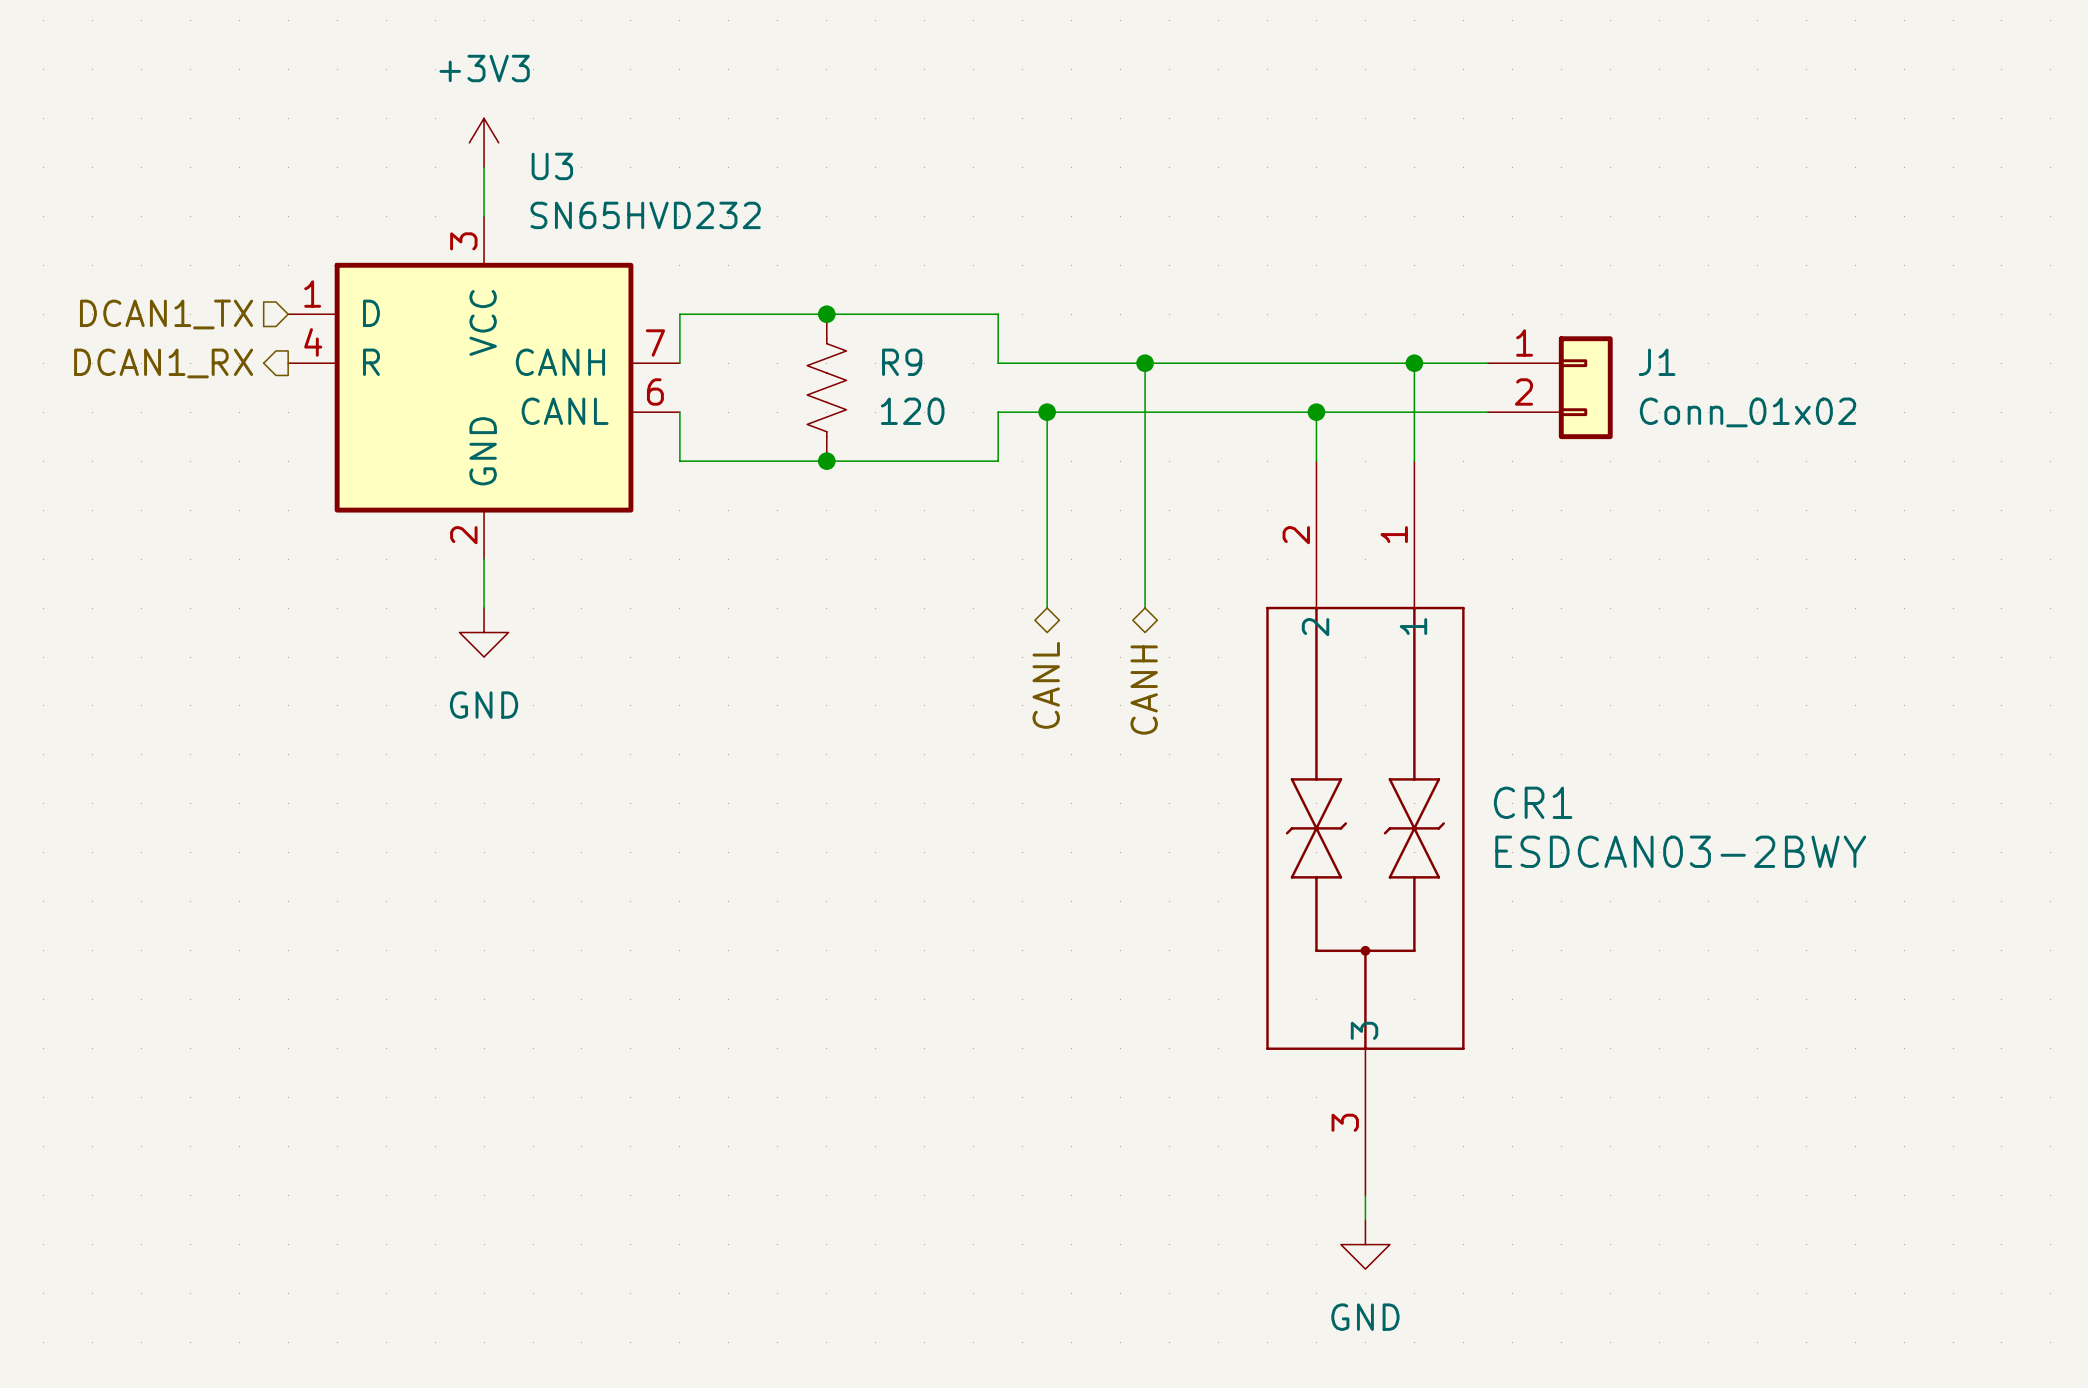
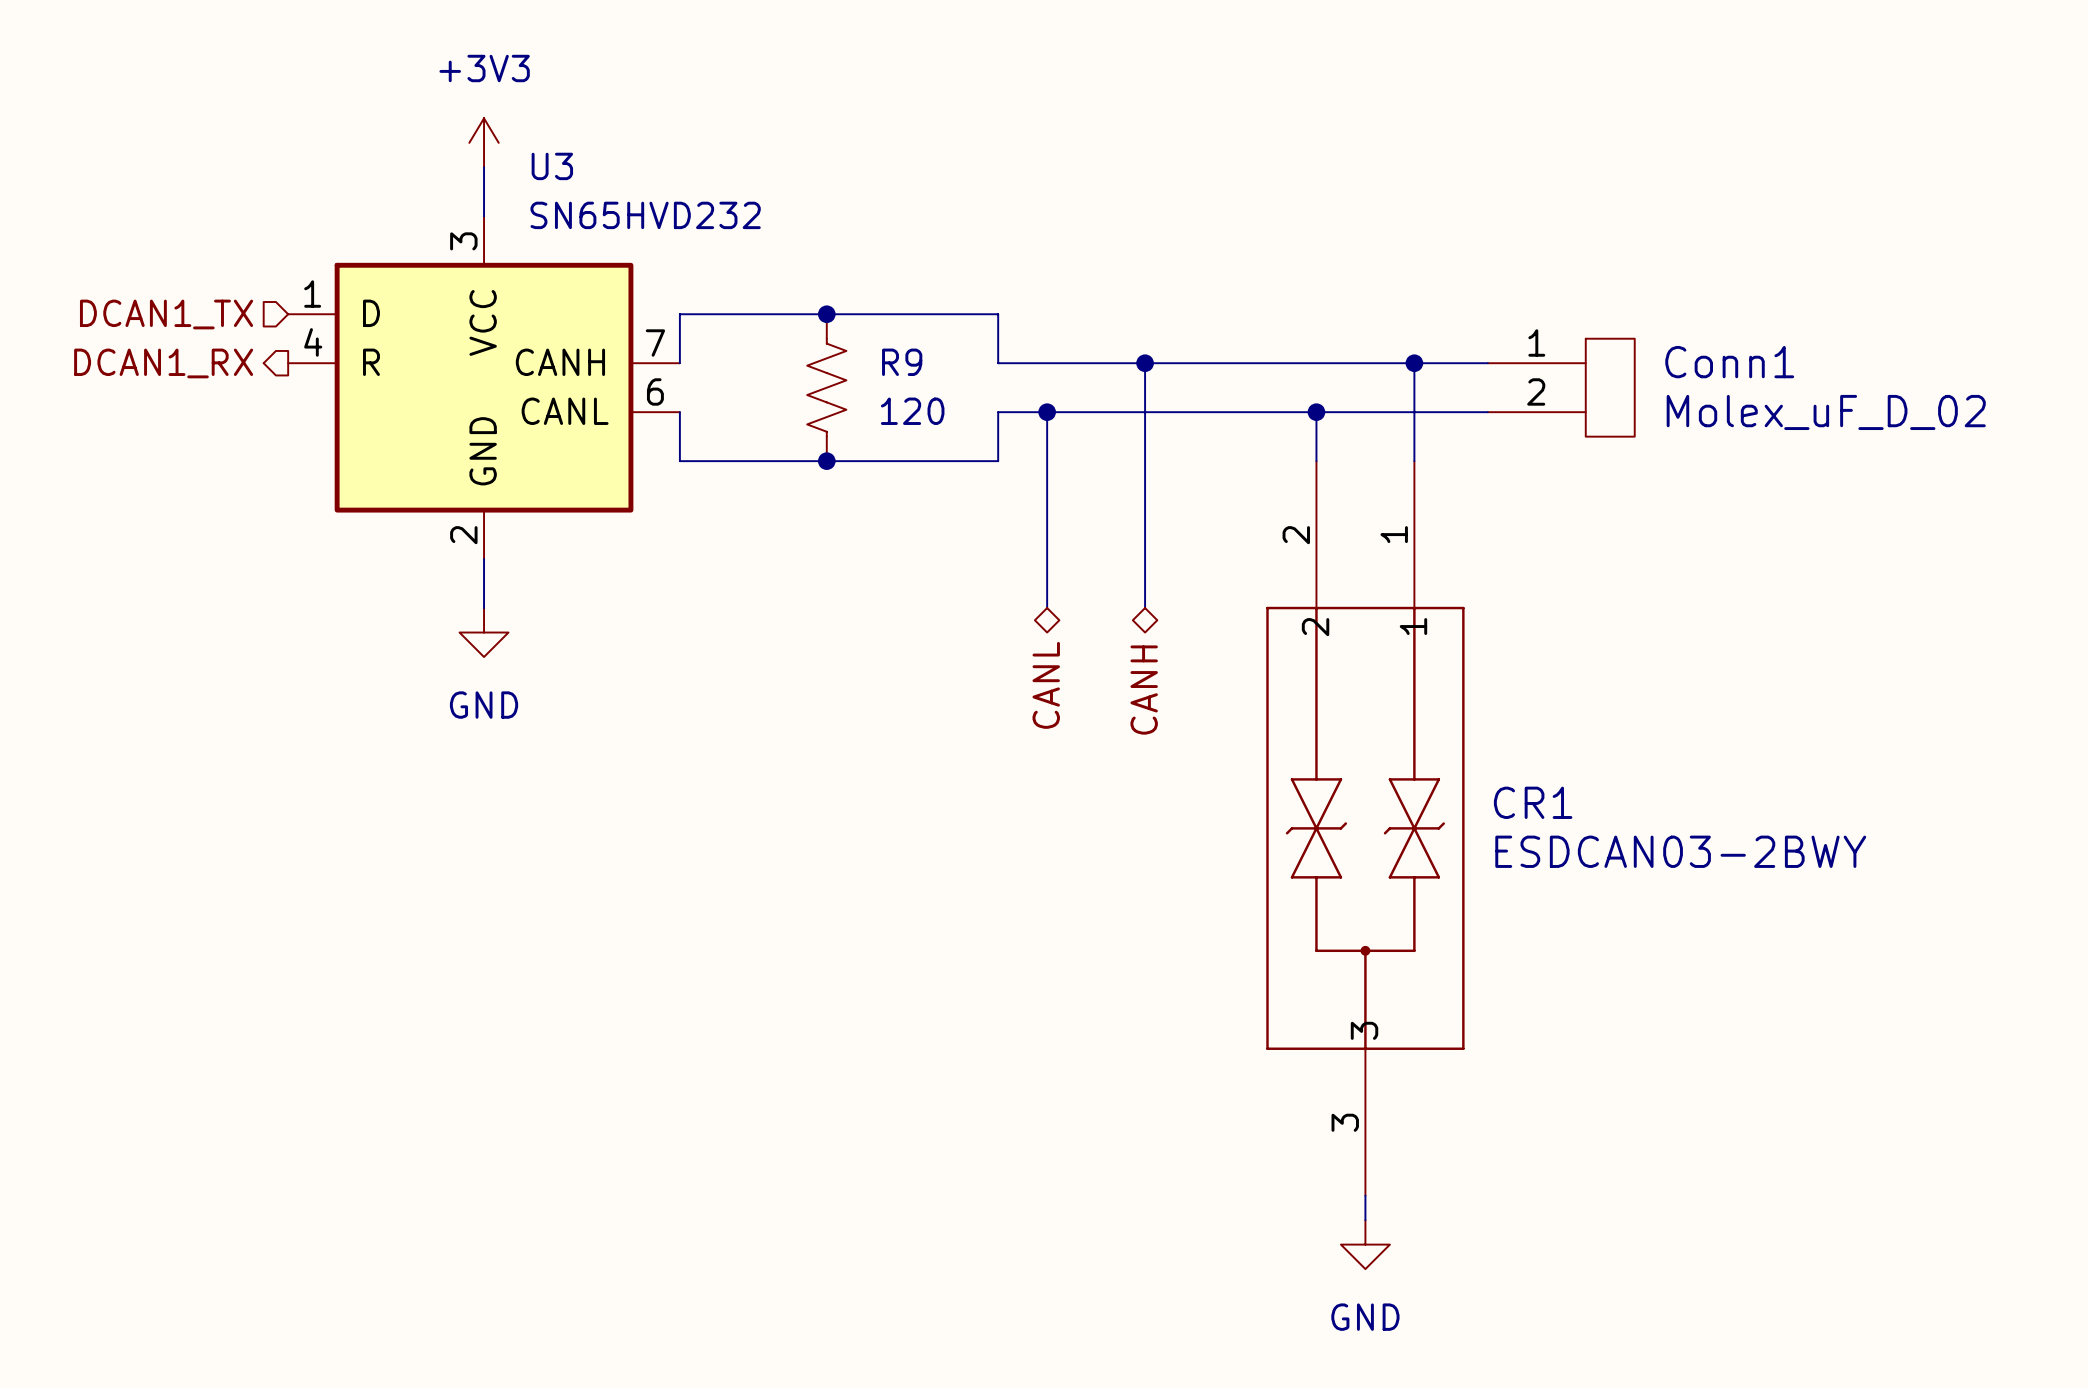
J1: Conn_01x02 (1550, 387) -> none
Conn1: none -> Molex_uF_D_02 (1561, 387)

